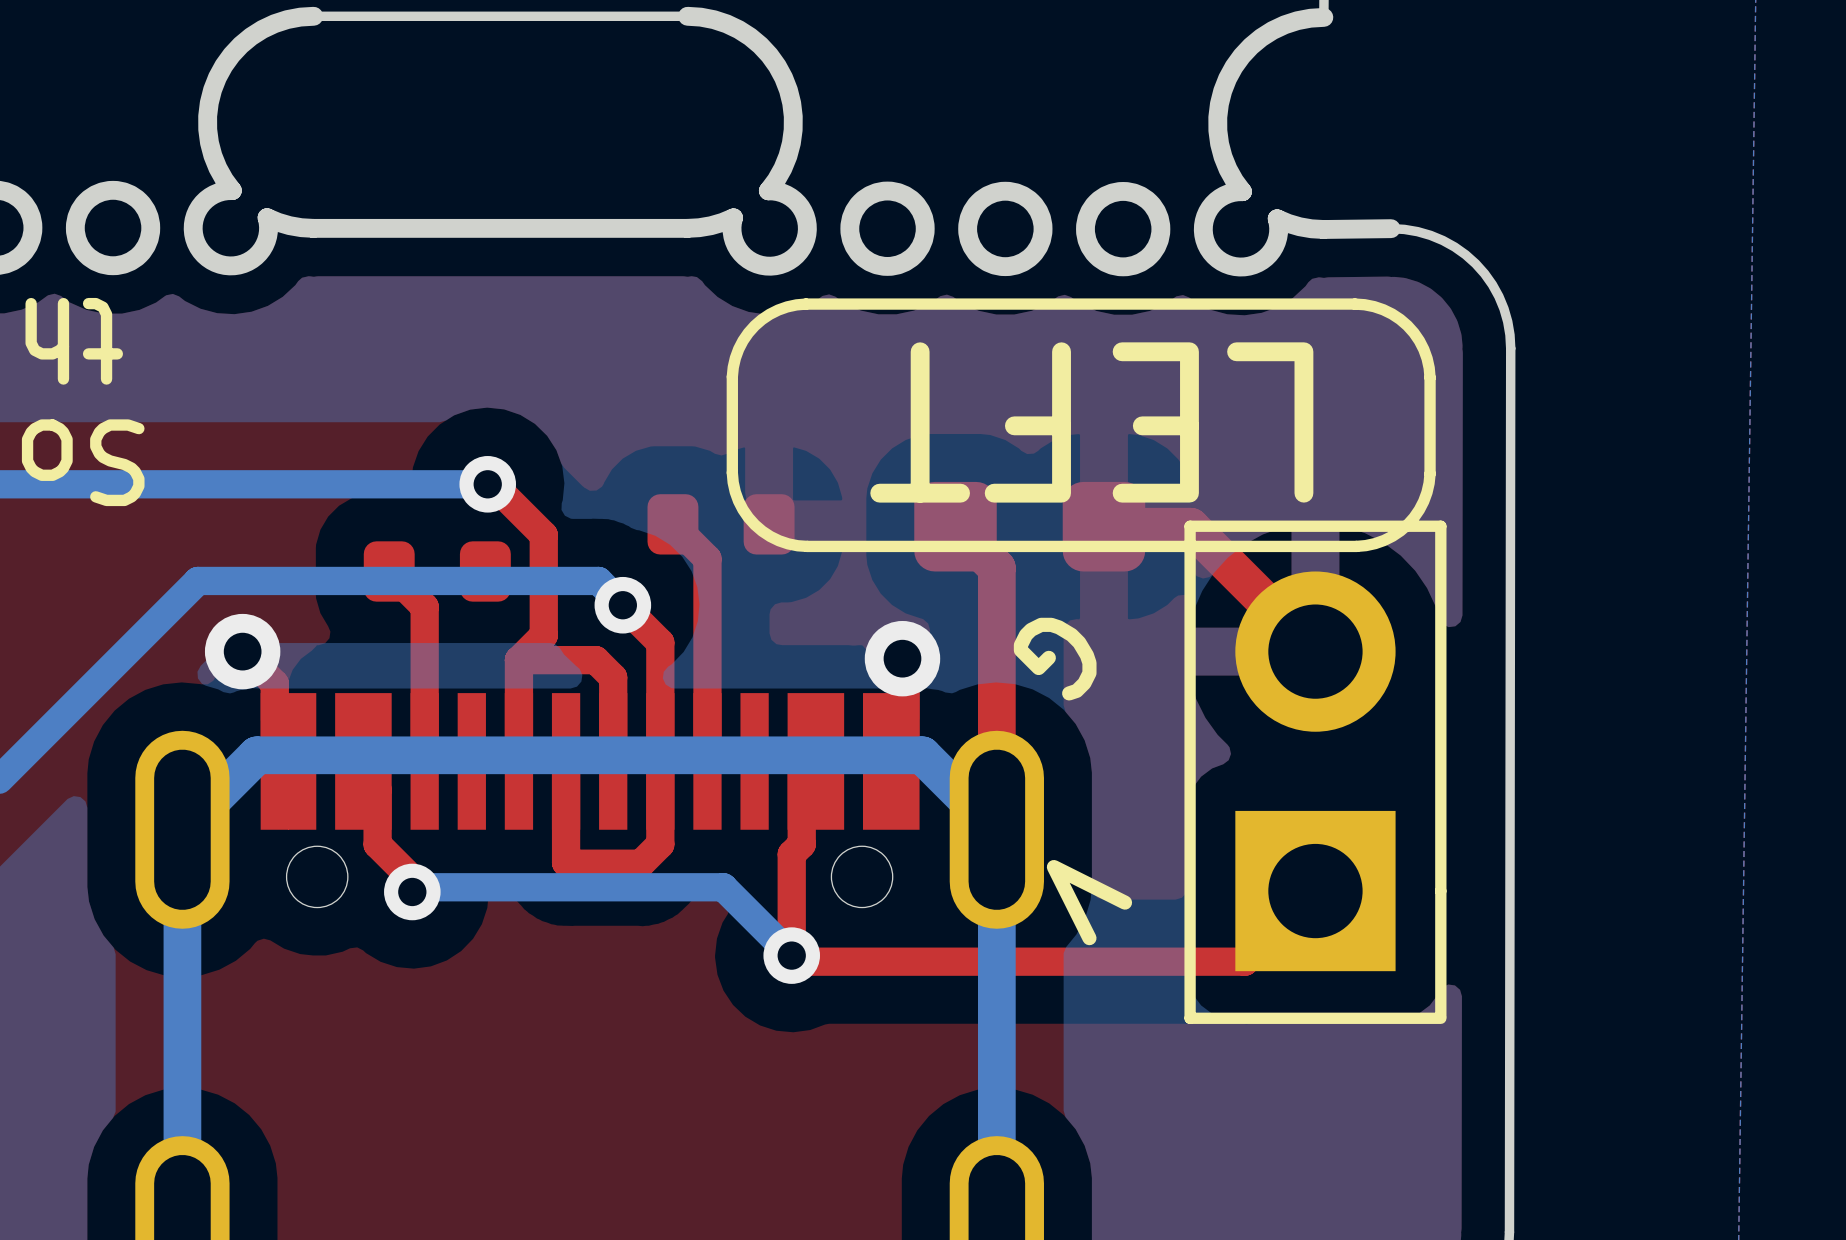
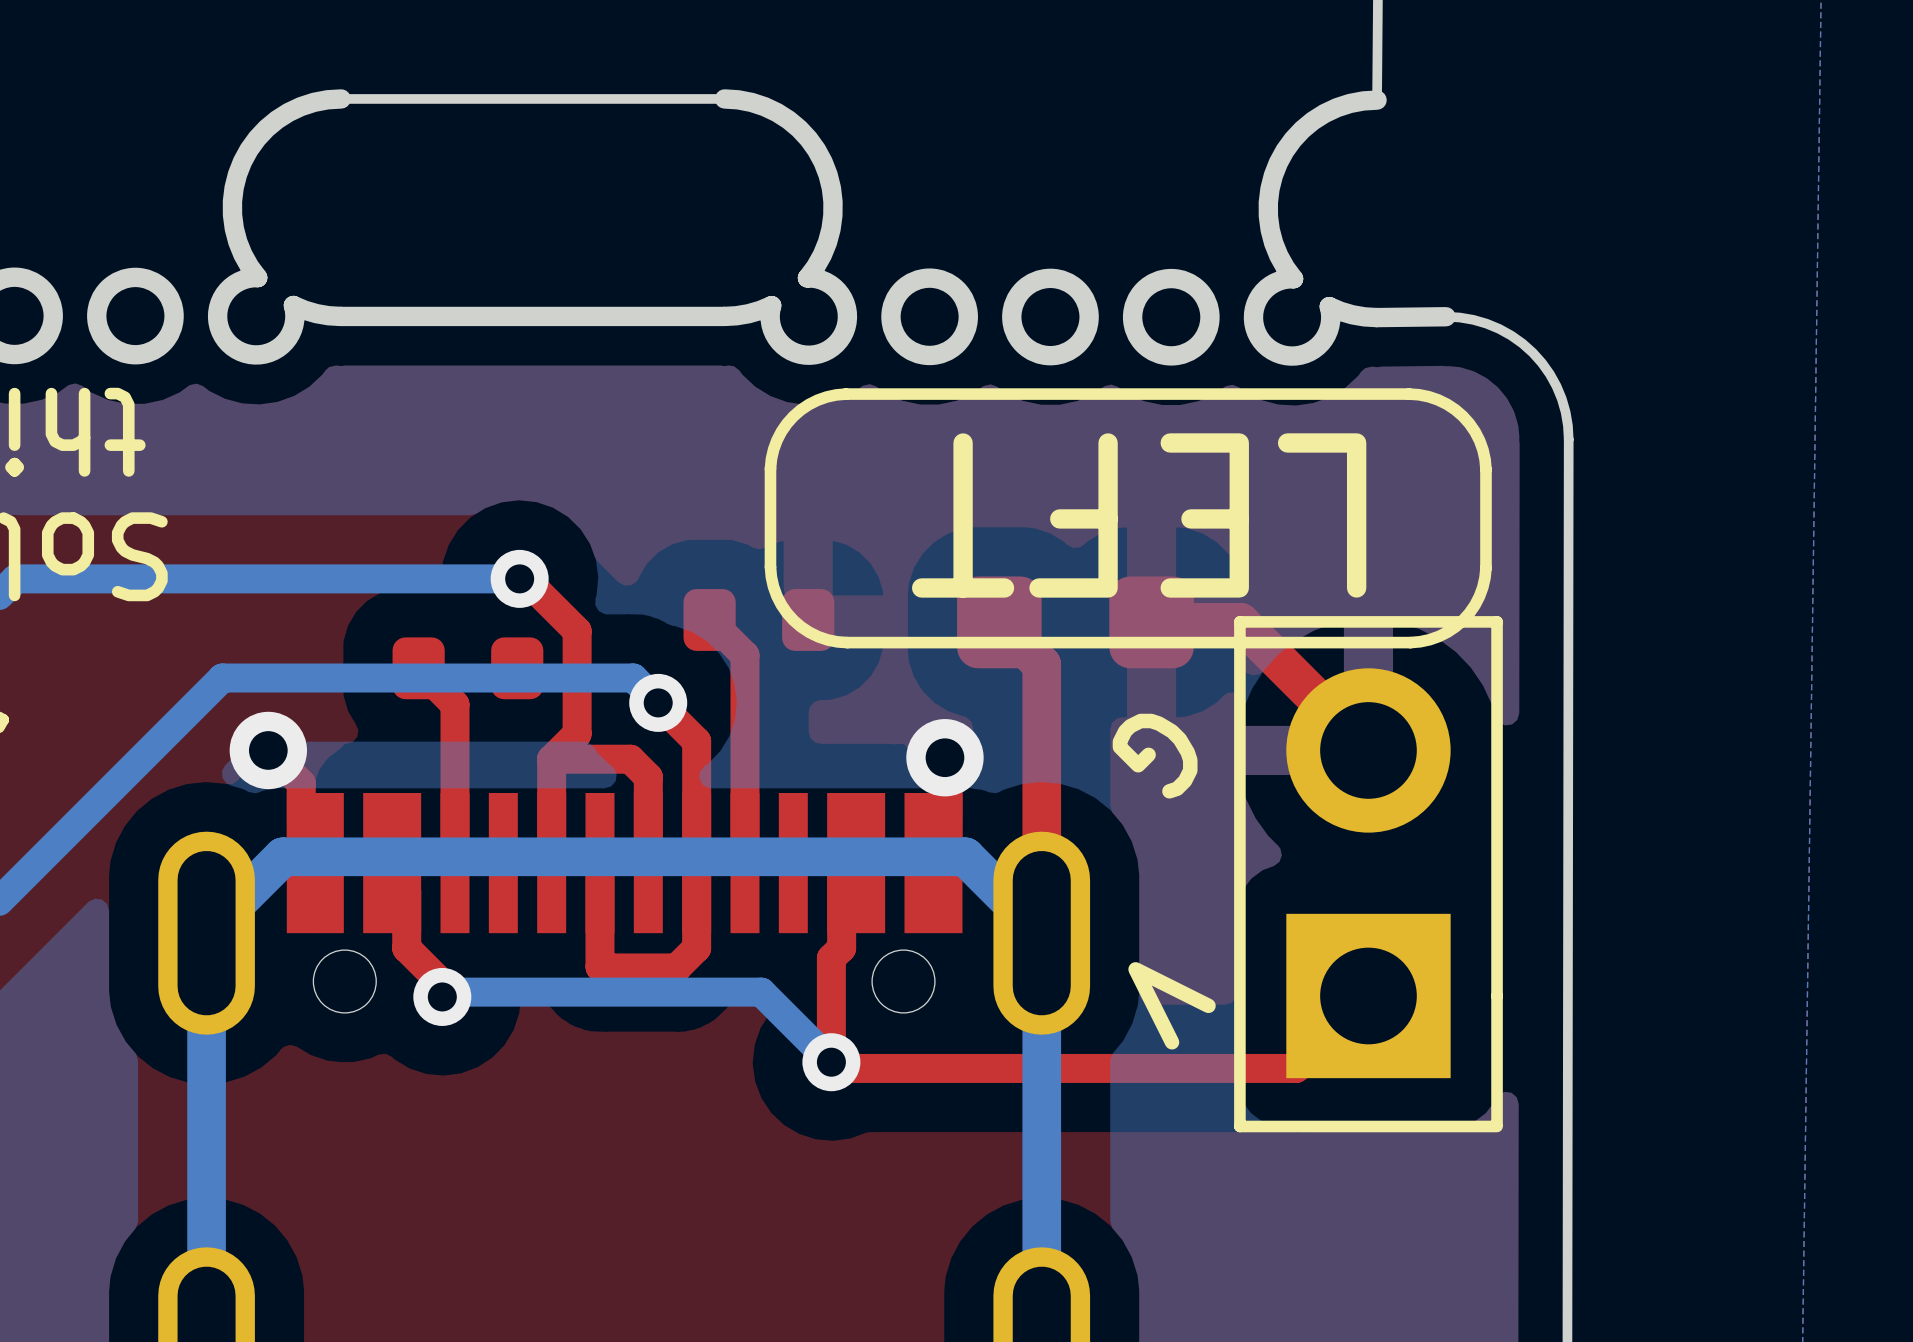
text position: G (1055, 659) -> G (1155, 756)
text position: V (1089, 902) -> V (1172, 1005)

